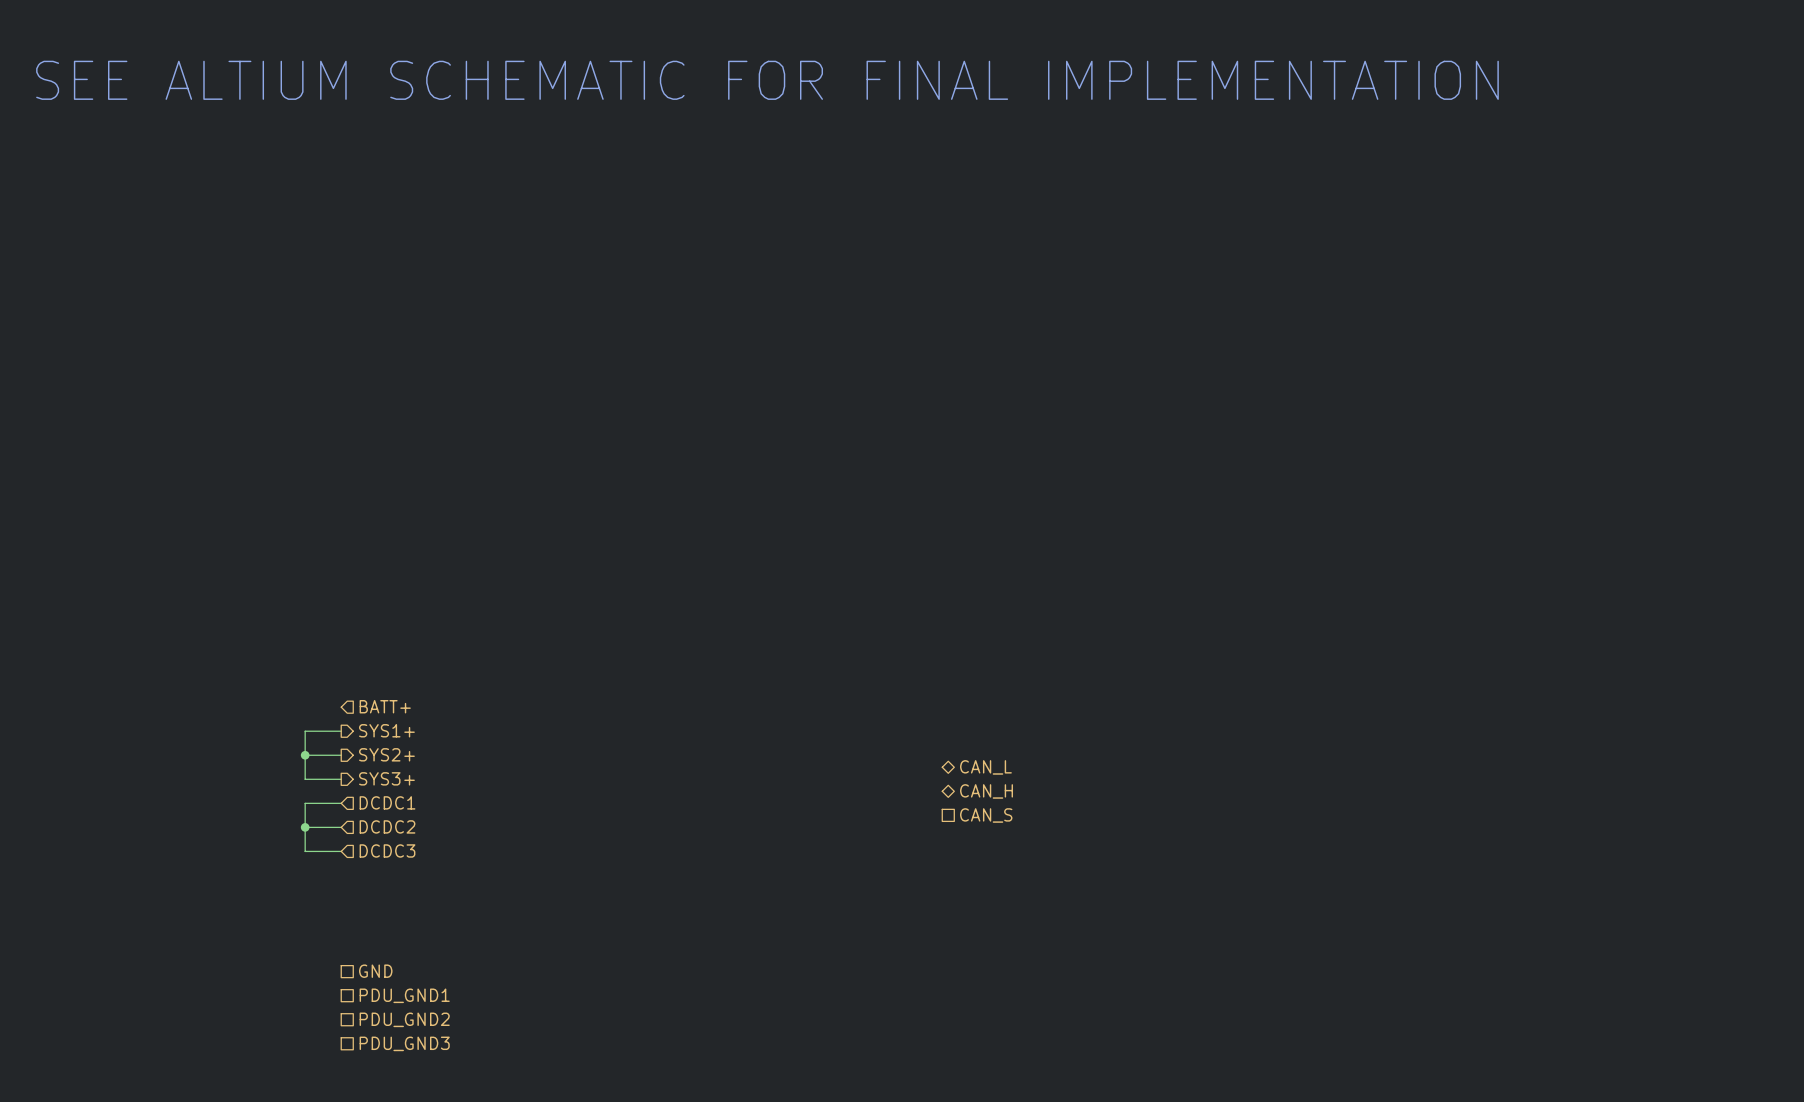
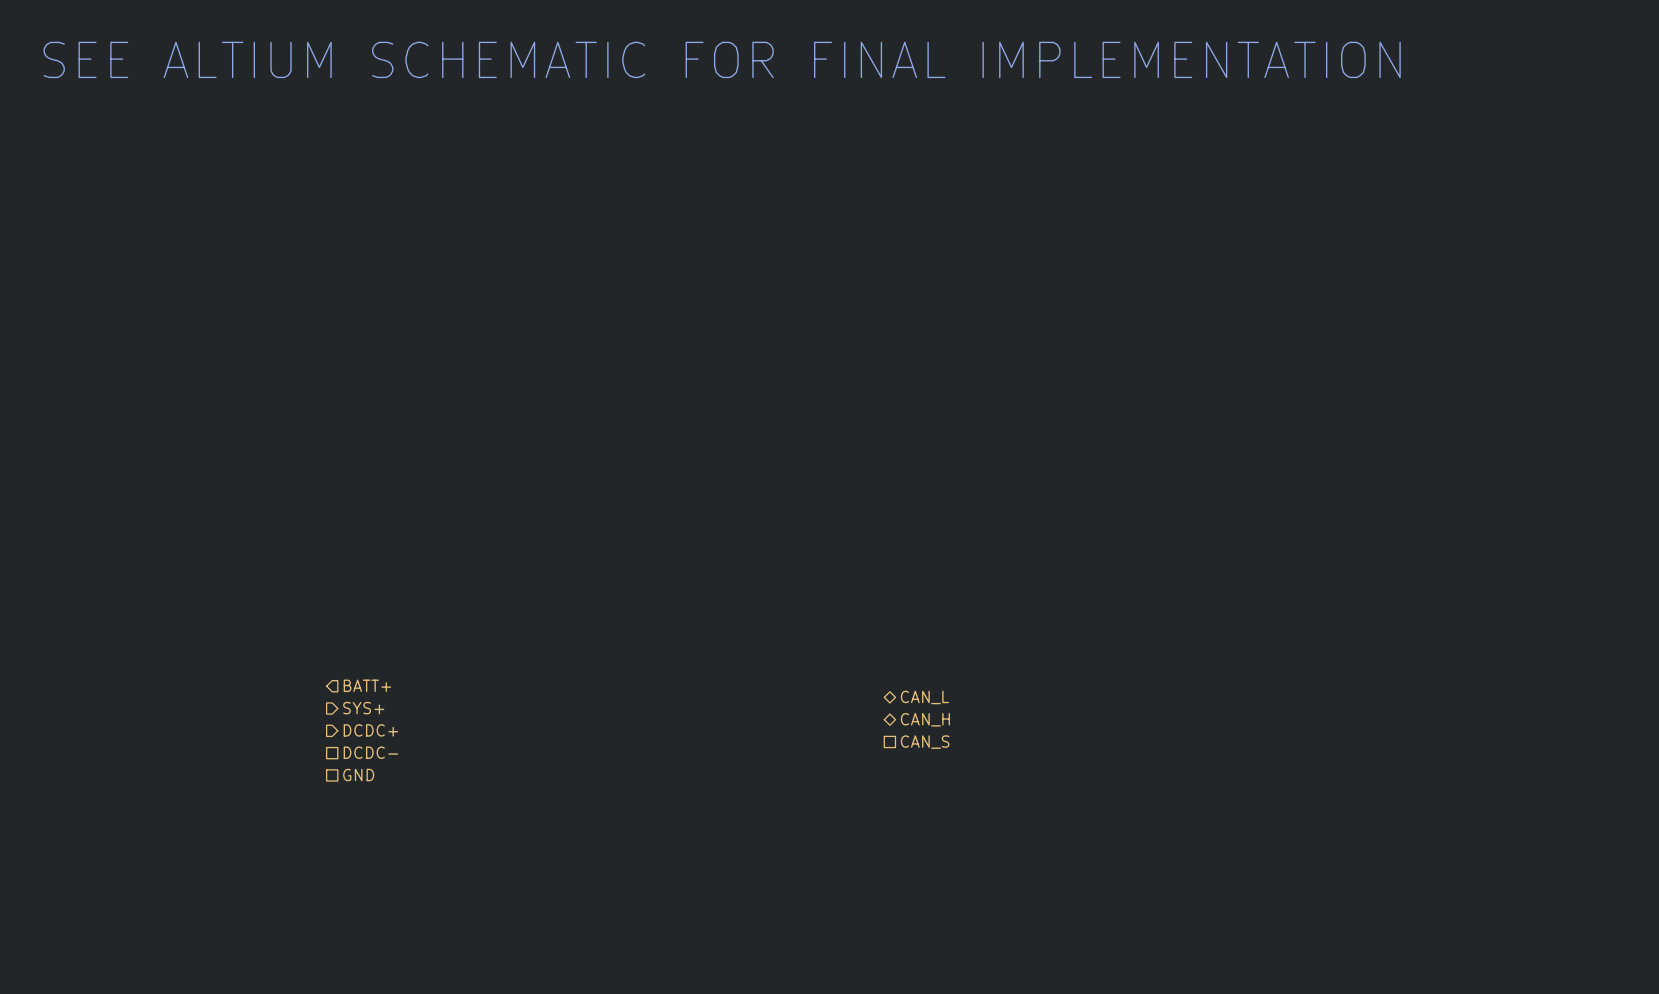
hierarchical label: BATT+ (385, 706) -> none
hierarchical label: SYS1+ (386, 730) -> none
wire: (341, 731) (305, 731) (305, 779) (341, 779) -> none
hierarchical label shape: output (386, 754) -> input (367, 685)
hierarchical label: SYS2+ (386, 754) -> BATT+ (367, 685)
wire: (305, 755) (341, 755) -> none
junction: (305, 755) -> none
hierarchical label: SYS3+ (386, 778) -> SYS+ (363, 708)
hierarchical label shape: input (387, 802) -> output (370, 730)
hierarchical label: DCDC1 (387, 802) -> DCDC+ (370, 730)
wire: (341, 803) (305, 803) (305, 851) (341, 851) -> none
hierarchical label shape: input (387, 826) -> passive (370, 752)
hierarchical label: DCDC2 (387, 826) -> DCDC- (370, 752)
wire: (305, 827) (341, 827) -> none
junction: (305, 827) -> none
hierarchical label shape: input (387, 850) -> passive (358, 775)
hierarchical label: DCDC3 (387, 850) -> GND (358, 775)
hierarchical label: GND (375, 971) -> none
hierarchical label: PDU_GND1 (404, 995) -> none
hierarchical label: PDU_GND2 (404, 1019) -> none
hierarchical label: PDU_GND3 (404, 1043) -> none

